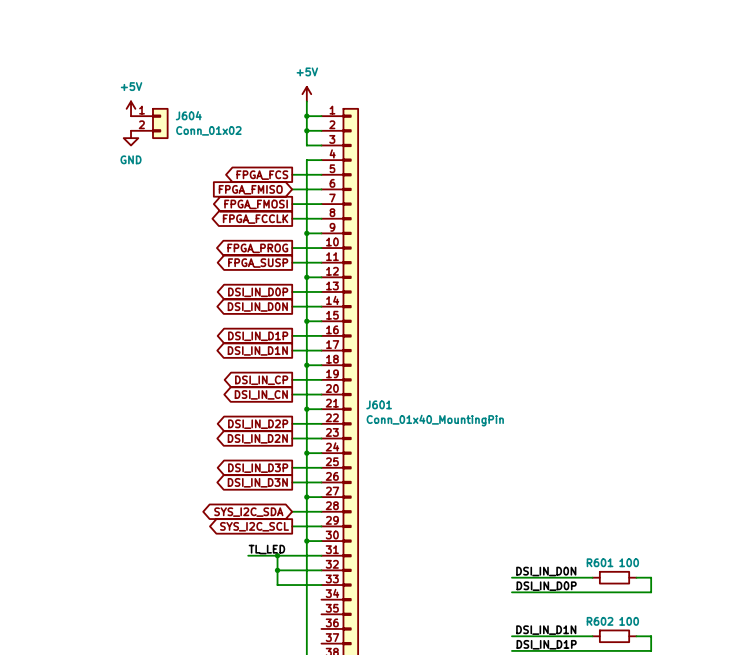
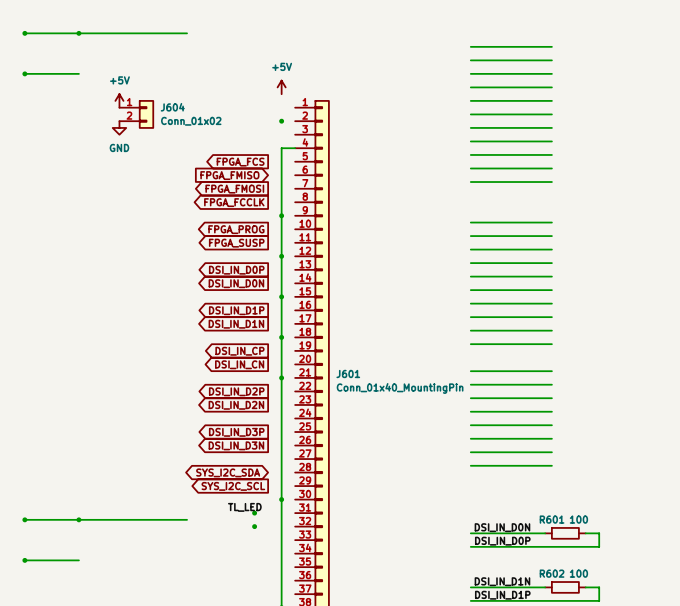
wire: none -> (24, 33) (187, 33)
junction: none -> (24, 33)
junction: none -> (78, 33)
wire: none -> (470, 46) (551, 46)
wire: none -> (470, 60) (551, 60)
wire: none -> (24, 73) (78, 73)
junction: none -> (24, 73)
wire: none -> (470, 73) (551, 73)
wire: none -> (470, 87) (551, 87)
wire: (306, 101) (306, 145) (321, 145) -> none
wire: none -> (470, 100) (551, 100)
wire: (306, 116) (321, 116) -> none
junction: (306, 116) -> none
wire: none -> (470, 114) (551, 114)
wire: (306, 130) (321, 130) -> none
wire: none -> (470, 127) (551, 127)
wire: none -> (470, 141) (551, 141)
wire: none -> (470, 154) (551, 154)
wire: (292, 174) (321, 174) -> none
wire: none -> (470, 168) (551, 168)
wire: (292, 189) (321, 189) -> none
wire: none -> (470, 182) (551, 182)
wire: (292, 204) (321, 204) -> none
wire: (292, 218) (321, 218) -> none
wire: (306, 233) (321, 233) -> none
wire: none -> (470, 222) (551, 222)
wire: (292, 248) (321, 248) -> none
wire: none -> (470, 236) (551, 236)
wire: (292, 262) (321, 262) -> none
wire: none -> (470, 249) (551, 249)
wire: (306, 277) (321, 277) -> none
wire: none -> (470, 263) (551, 263)
wire: (292, 291) (321, 291) -> none
wire: none -> (470, 276) (551, 276)
wire: (292, 306) (321, 306) -> none
wire: none -> (470, 290) (551, 290)
wire: (306, 321) (321, 321) -> none
wire: none -> (470, 303) (551, 303)
wire: (292, 335) (321, 335) -> none
wire: none -> (470, 317) (551, 317)
wire: (292, 350) (321, 350) -> none
wire: none -> (470, 330) (551, 330)
wire: (306, 365) (321, 365) -> none
wire: none -> (470, 344) (551, 344)
wire: (292, 379) (321, 379) -> none
wire: (292, 394) (321, 394) -> none
wire: none -> (470, 371) (551, 371)
wire: (306, 409) (321, 409) -> none
wire: none -> (470, 384) (551, 384)
wire: (292, 423) (321, 423) -> none
wire: none -> (470, 398) (551, 398)
wire: (292, 438) (321, 438) -> none
wire: none -> (470, 411) (551, 411)
wire: (306, 453) (321, 453) -> none
junction: (306, 453) -> none
wire: none -> (470, 425) (551, 425)
wire: (292, 467) (321, 467) -> none
wire: none -> (470, 438) (551, 438)
wire: (292, 482) (321, 482) -> none
wire: none -> (470, 452) (551, 452)
wire: (306, 497) (321, 497) -> none
junction: (306, 497) -> none
wire: none -> (470, 465) (551, 465)
wire: (292, 511) (321, 511) -> none
wire: (292, 526) (321, 526) -> none
wire: (306, 541) (321, 541) -> none
wire: (248, 555) (321, 555) -> none
wire: (277, 555) (277, 585) (321, 585) -> none
wire: none -> (24, 519) (187, 519)
junction: none -> (24, 519)
junction: none -> (78, 519)
wire: (277, 570) (321, 570) -> none
wire: none -> (24, 560) (78, 560)
junction: none -> (24, 560)

